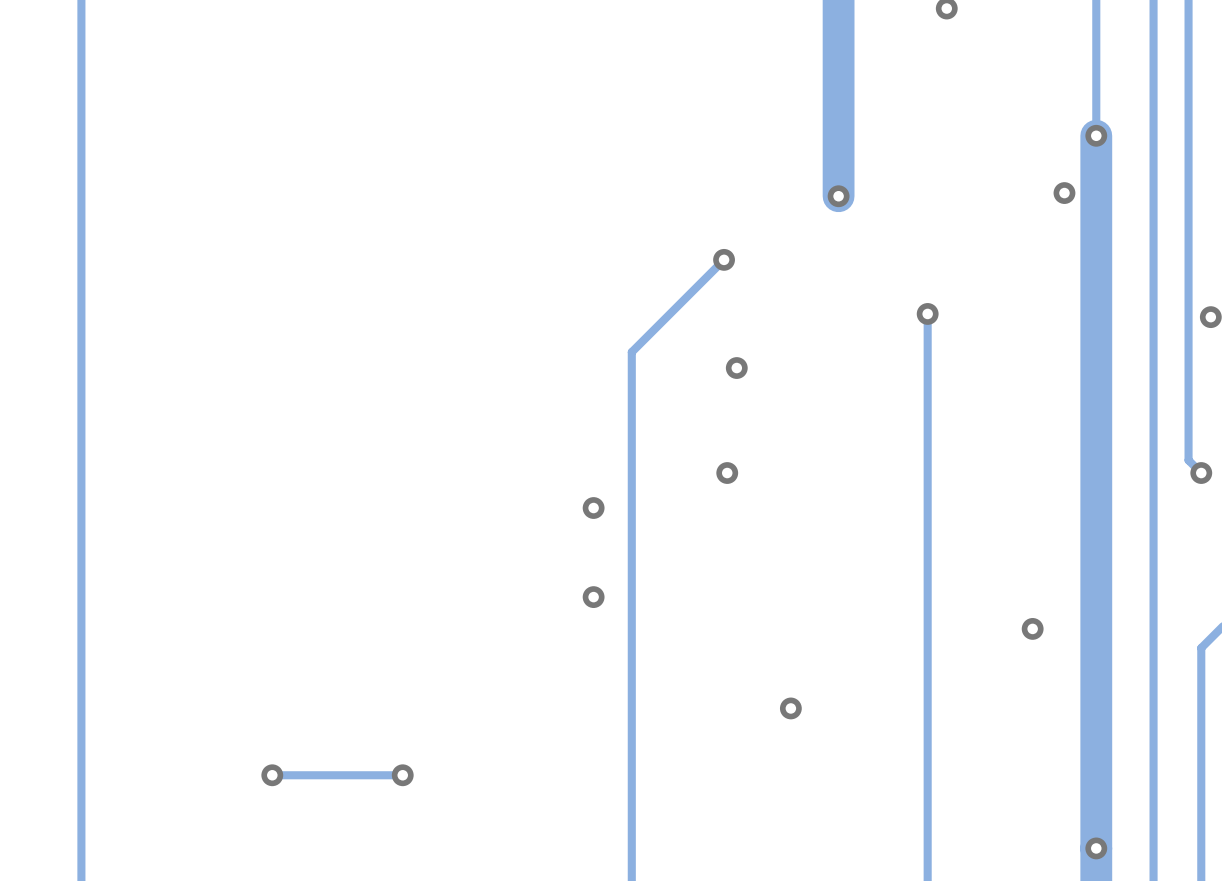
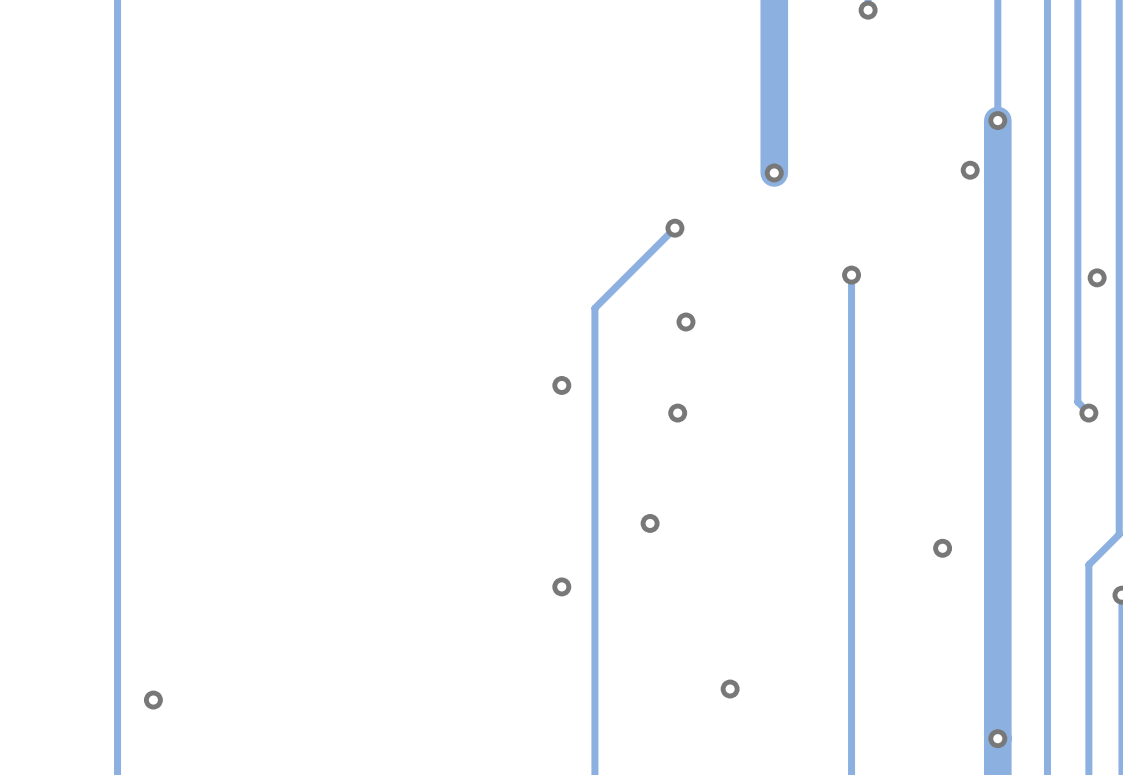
via position: (593, 508) -> (561, 385)
via: (593, 597) -> none
via: none -> (650, 523)
via: none -> (561, 586)
via: (790, 708) -> none
via: (272, 775) -> none
track: (402, 775) (272, 775) -> none
via: (402, 775) -> none
via: none -> (730, 689)
via: none -> (153, 700)

